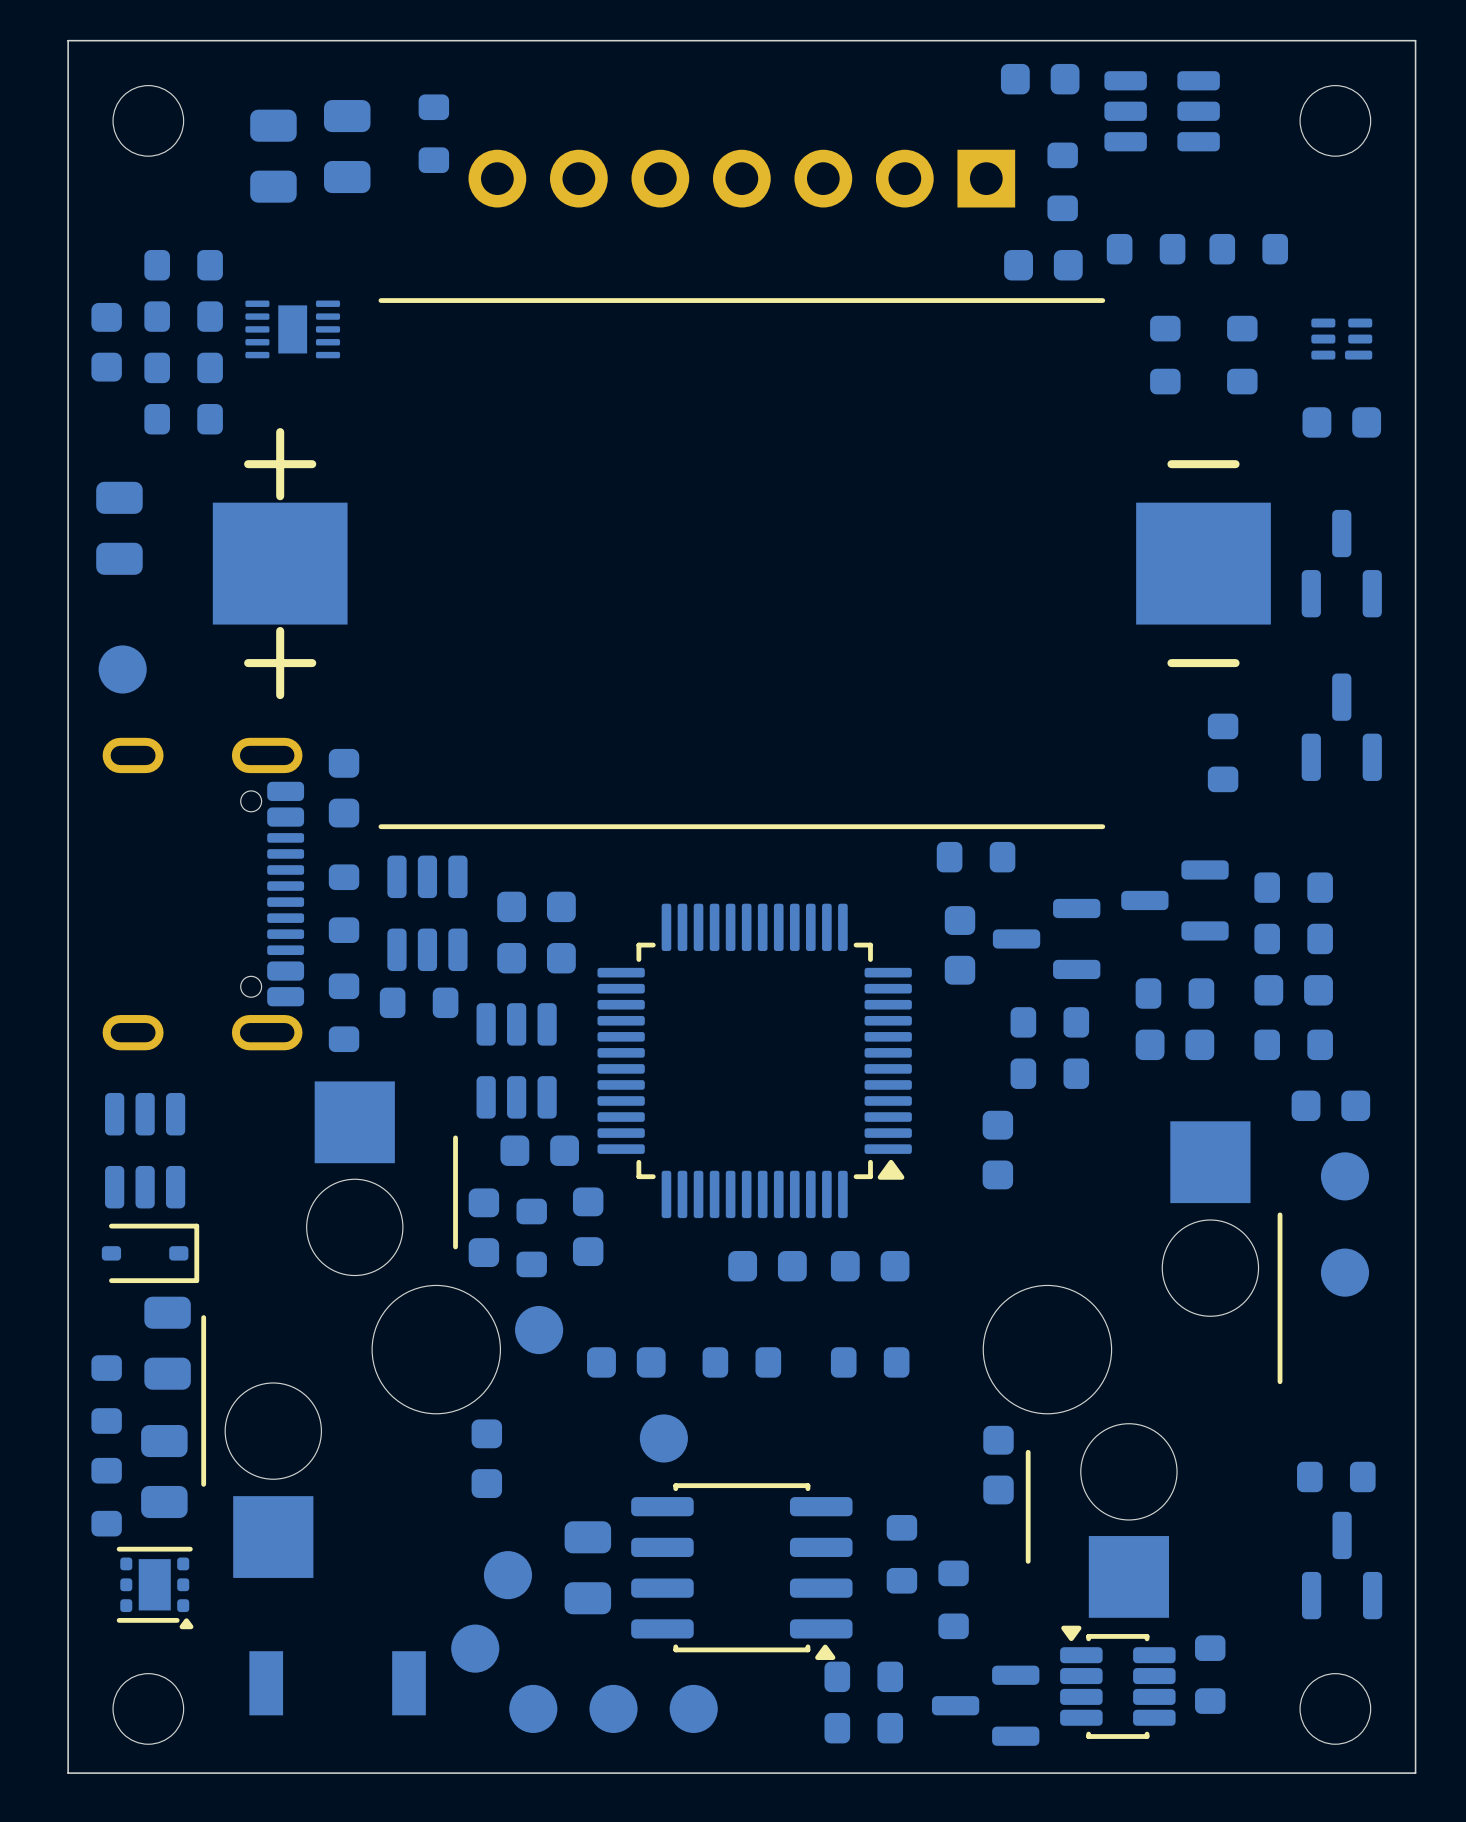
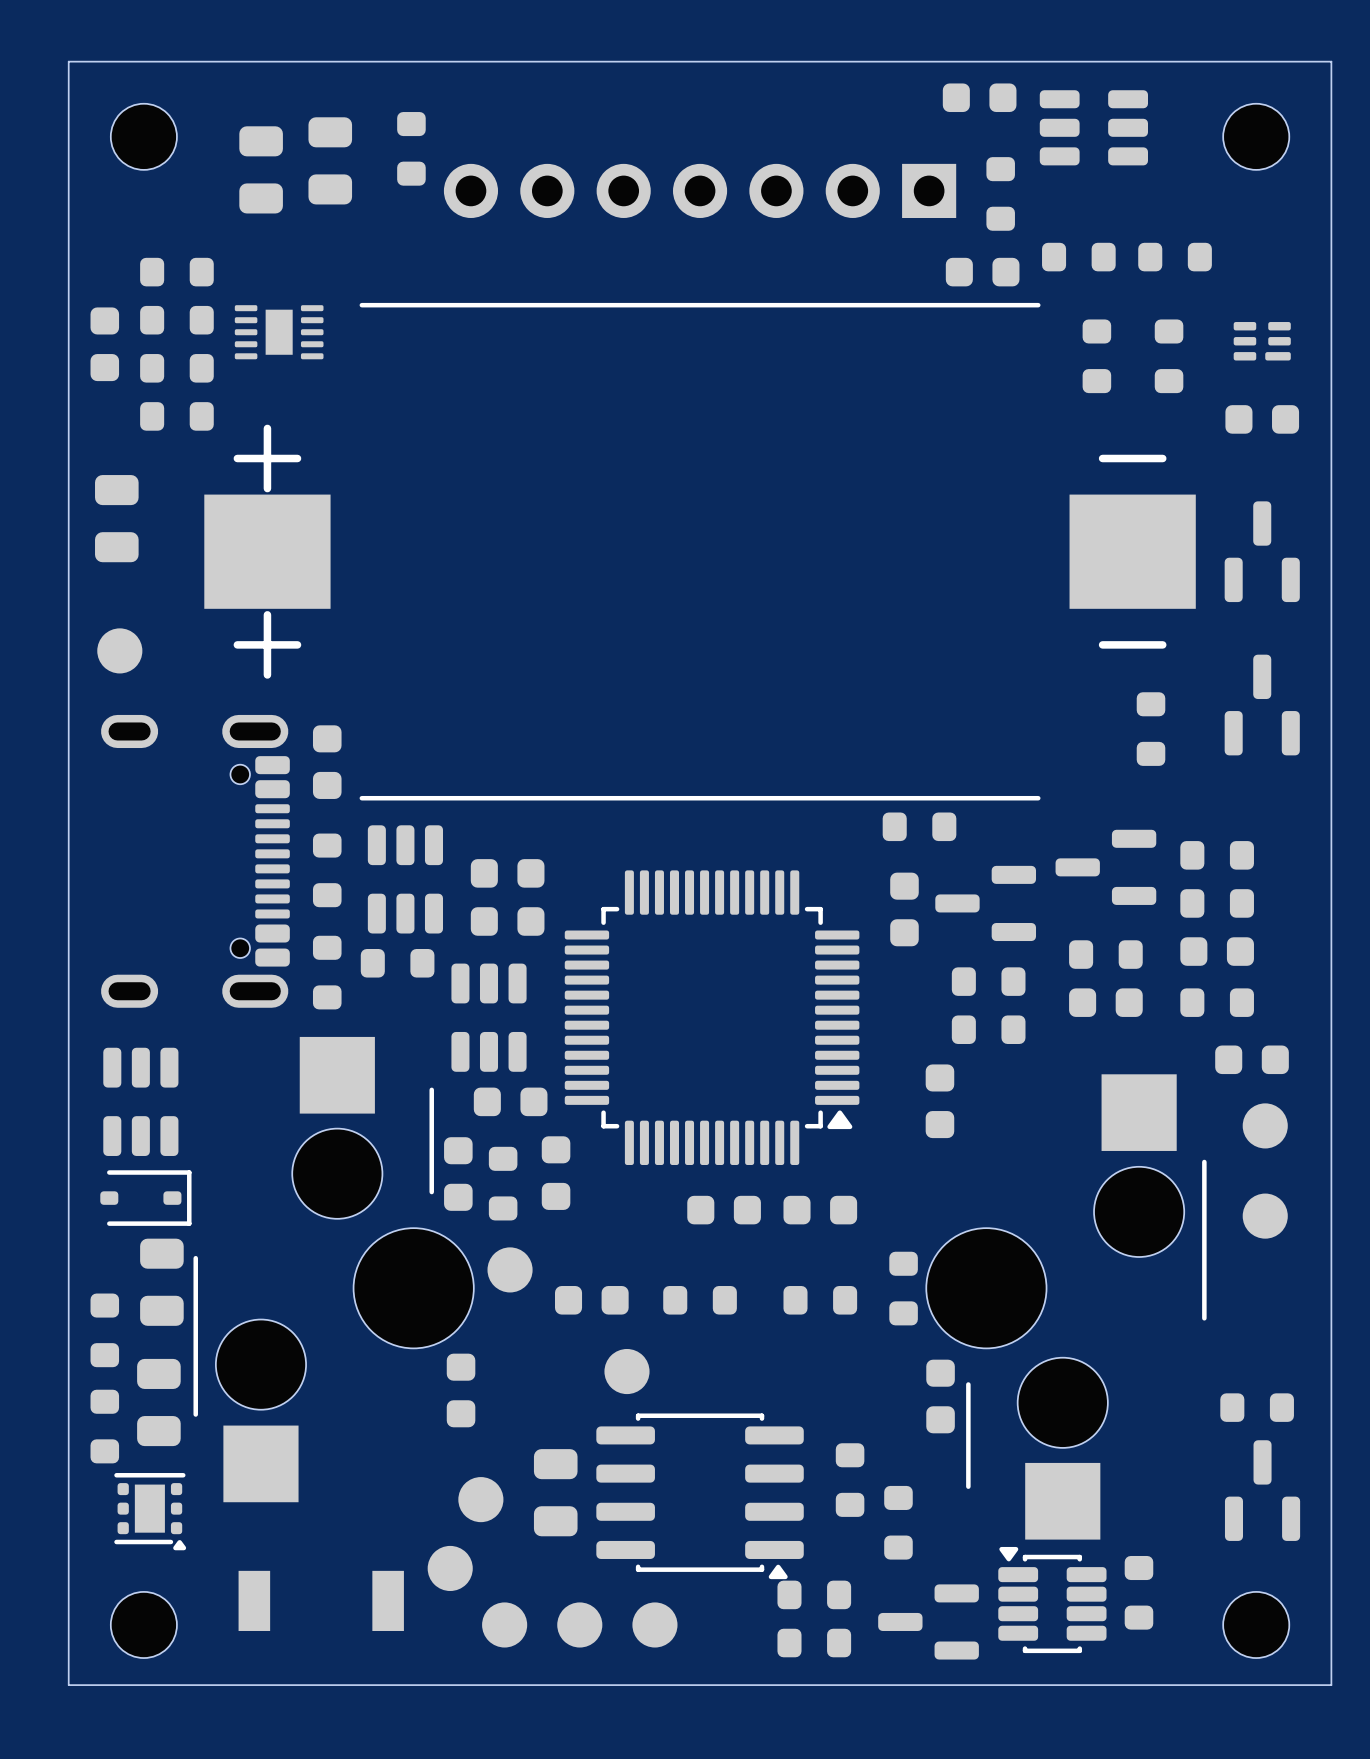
part: none -> (903, 1288)

